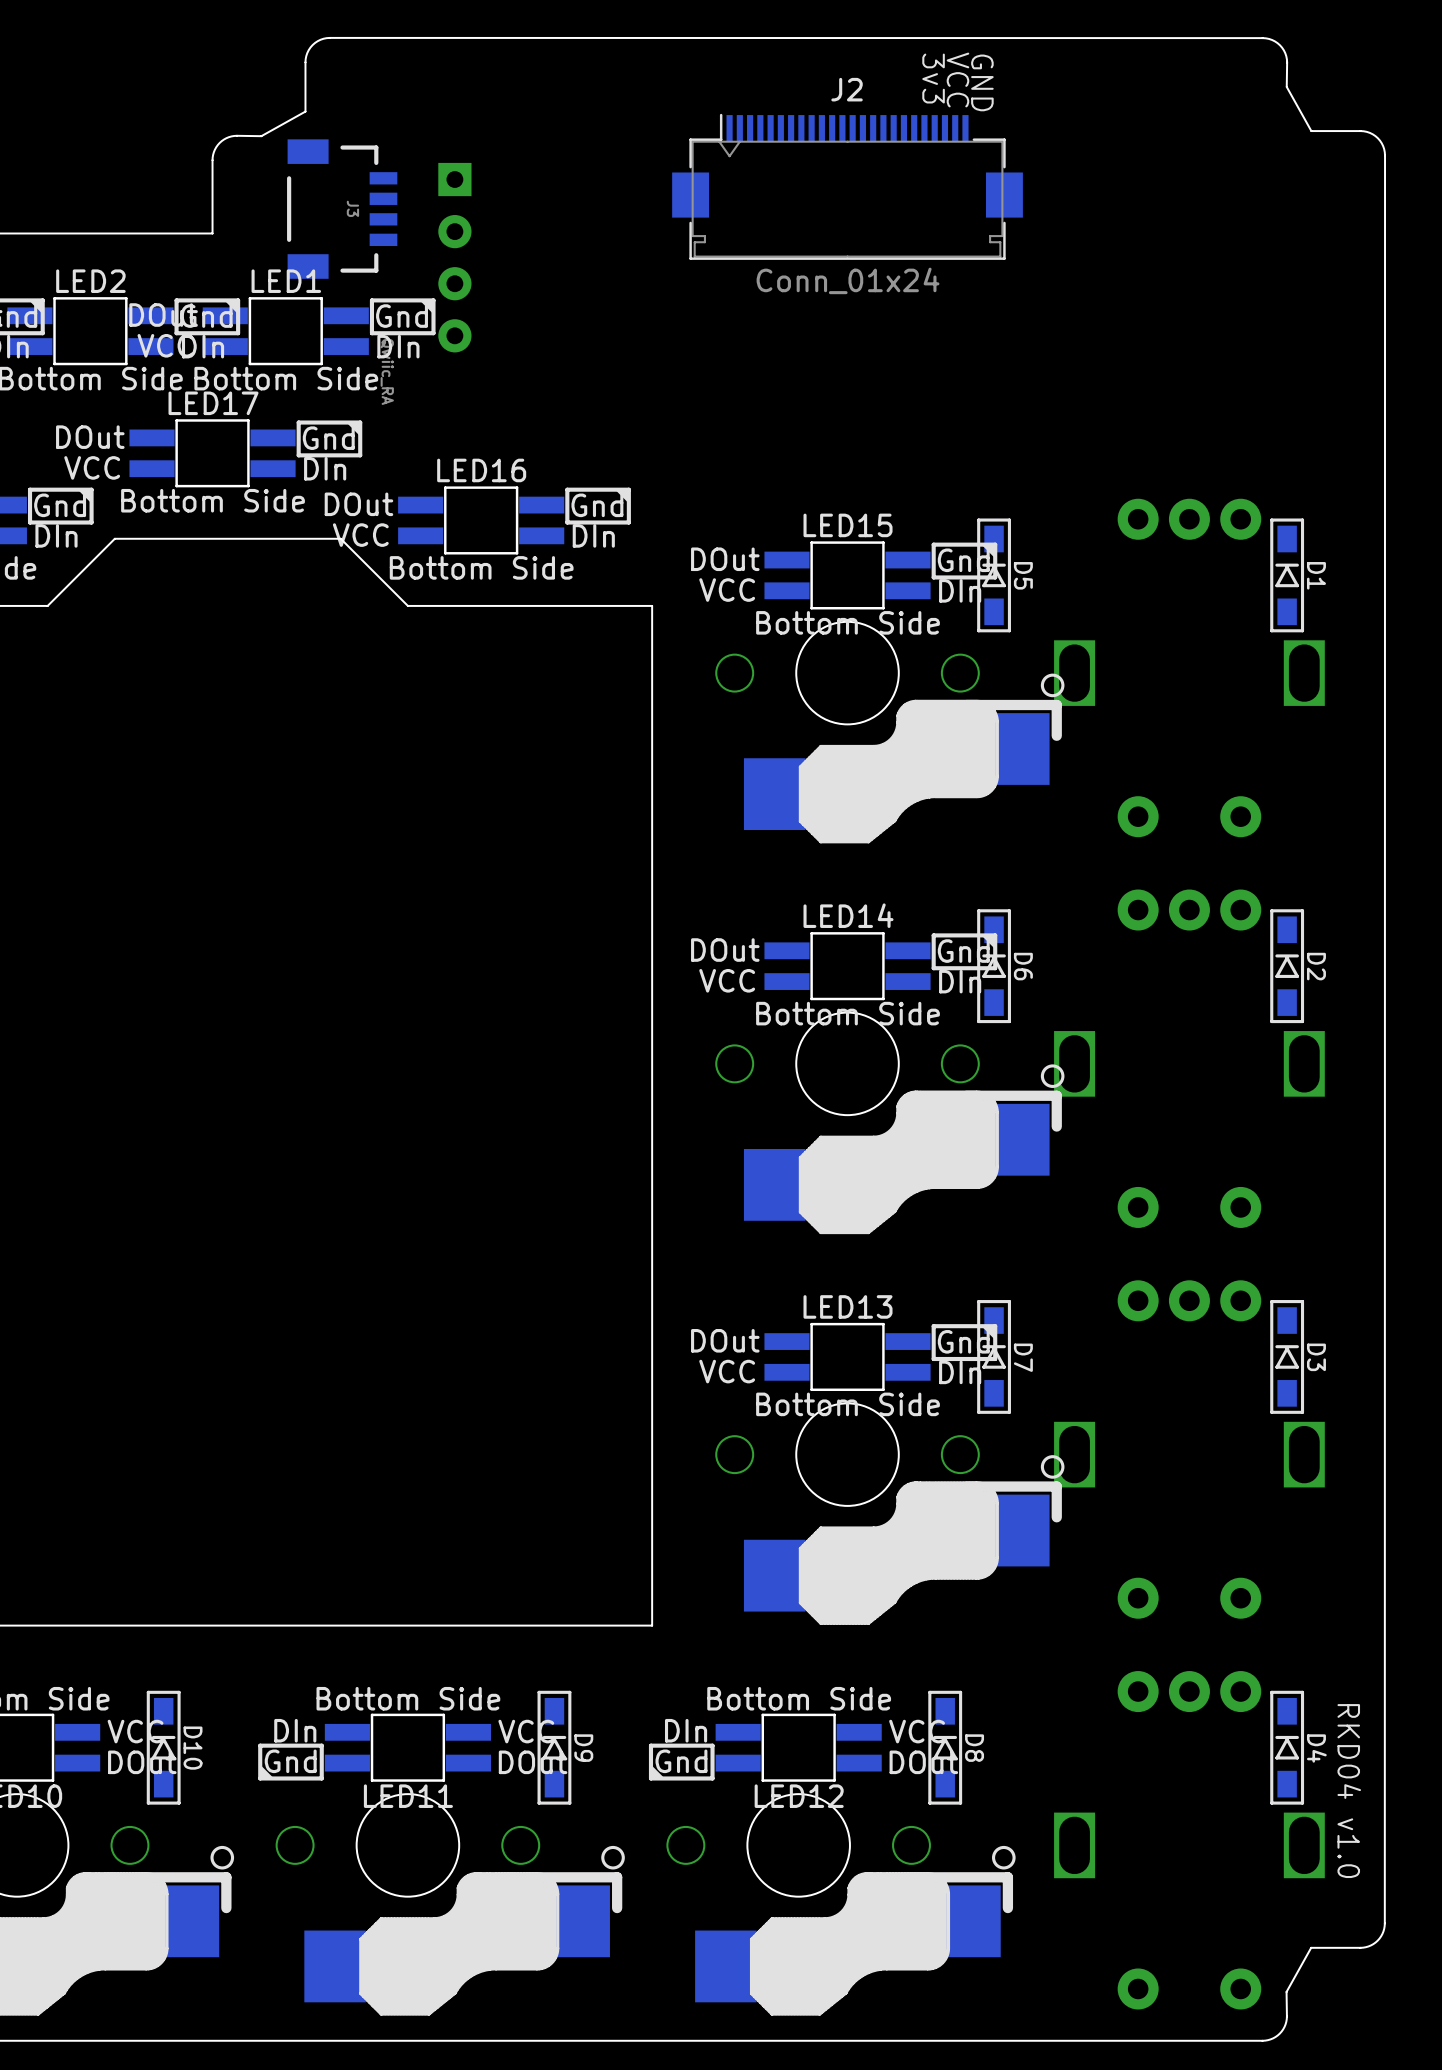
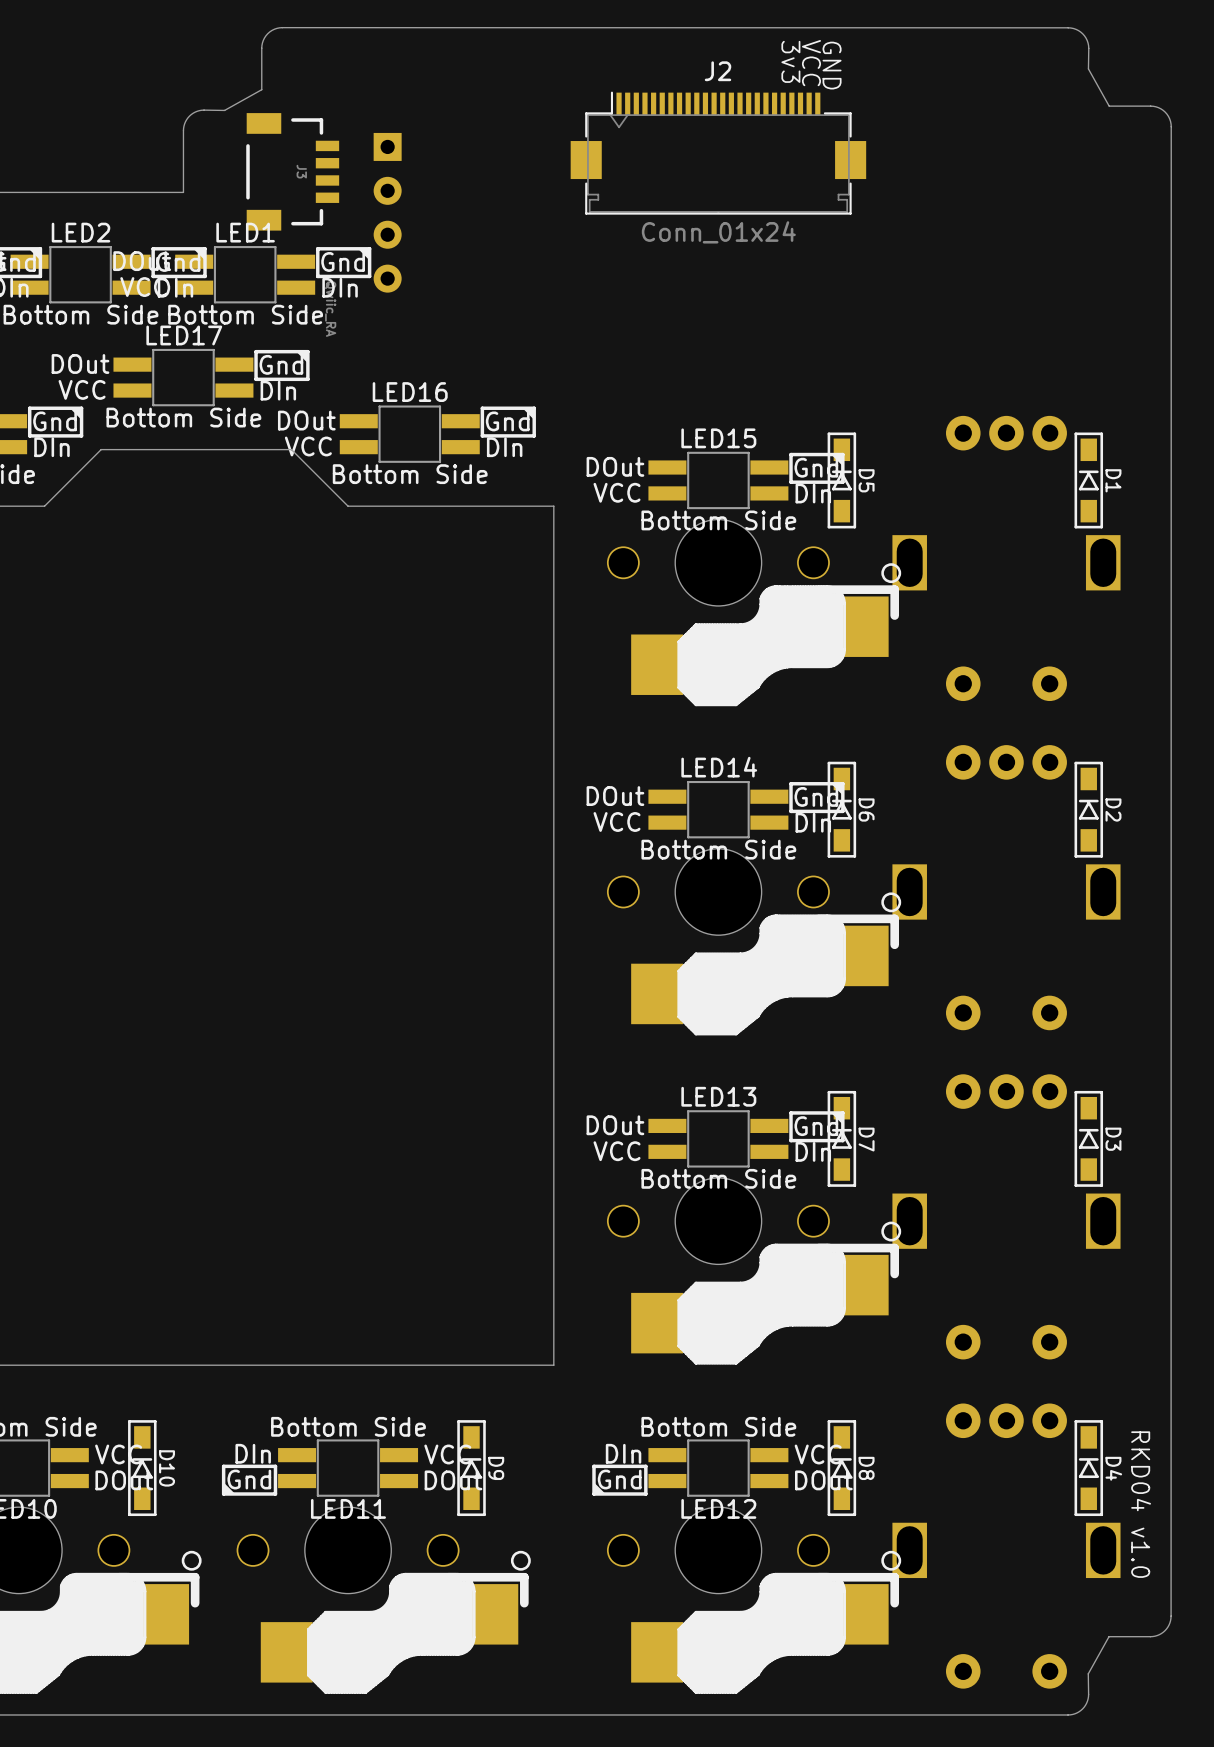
LED12 position: (765, 1747) -> (690, 1468)
D8 position: (945, 1747) -> (841, 1468)
part position: (840, 1904) -> (754, 1600)

